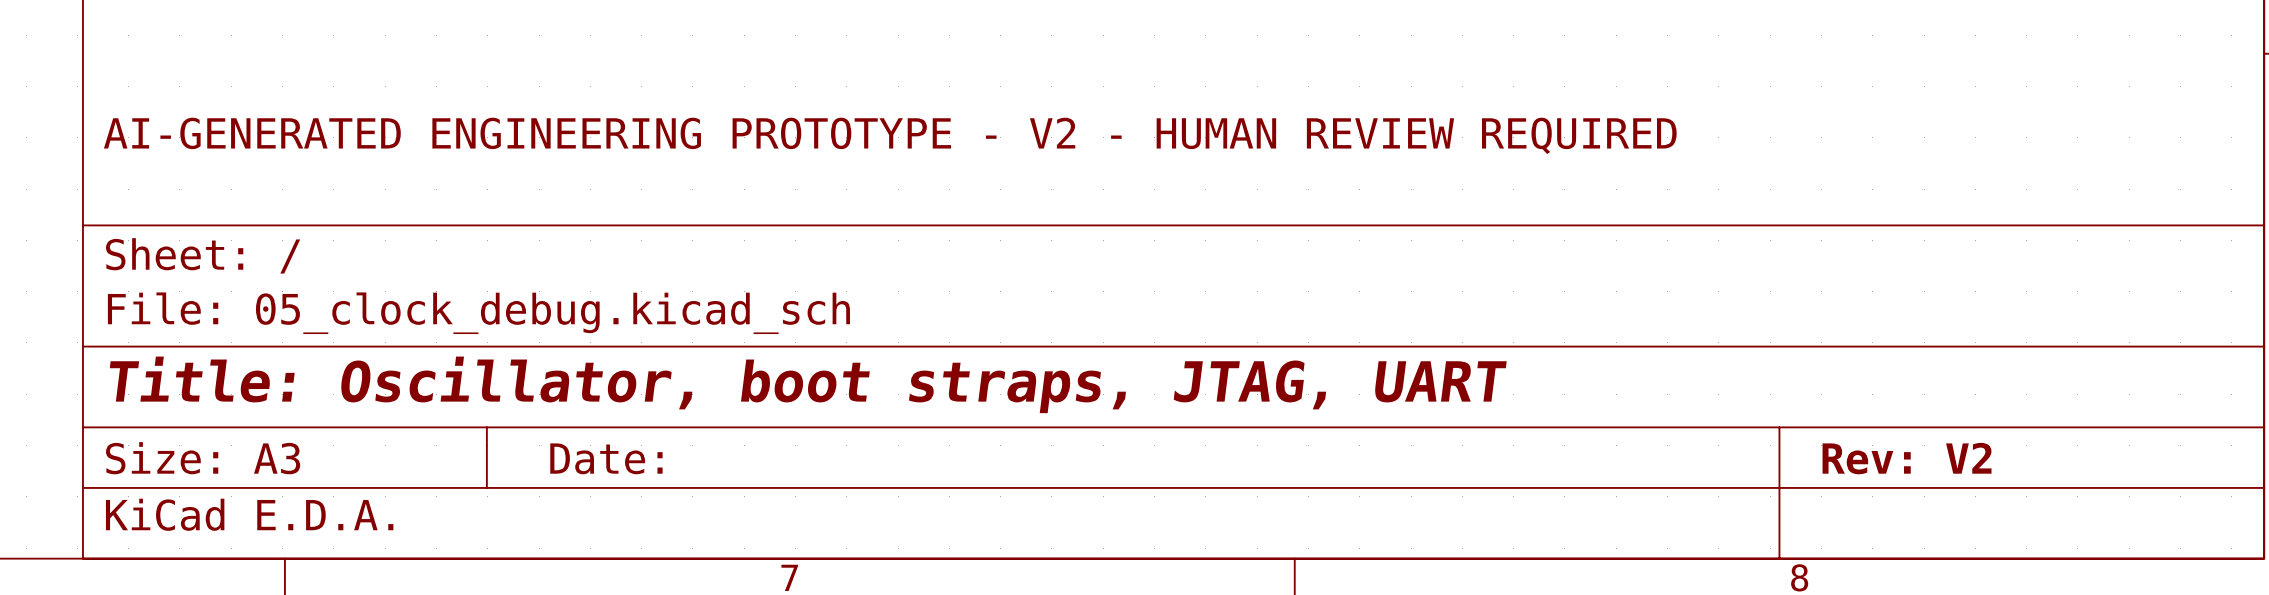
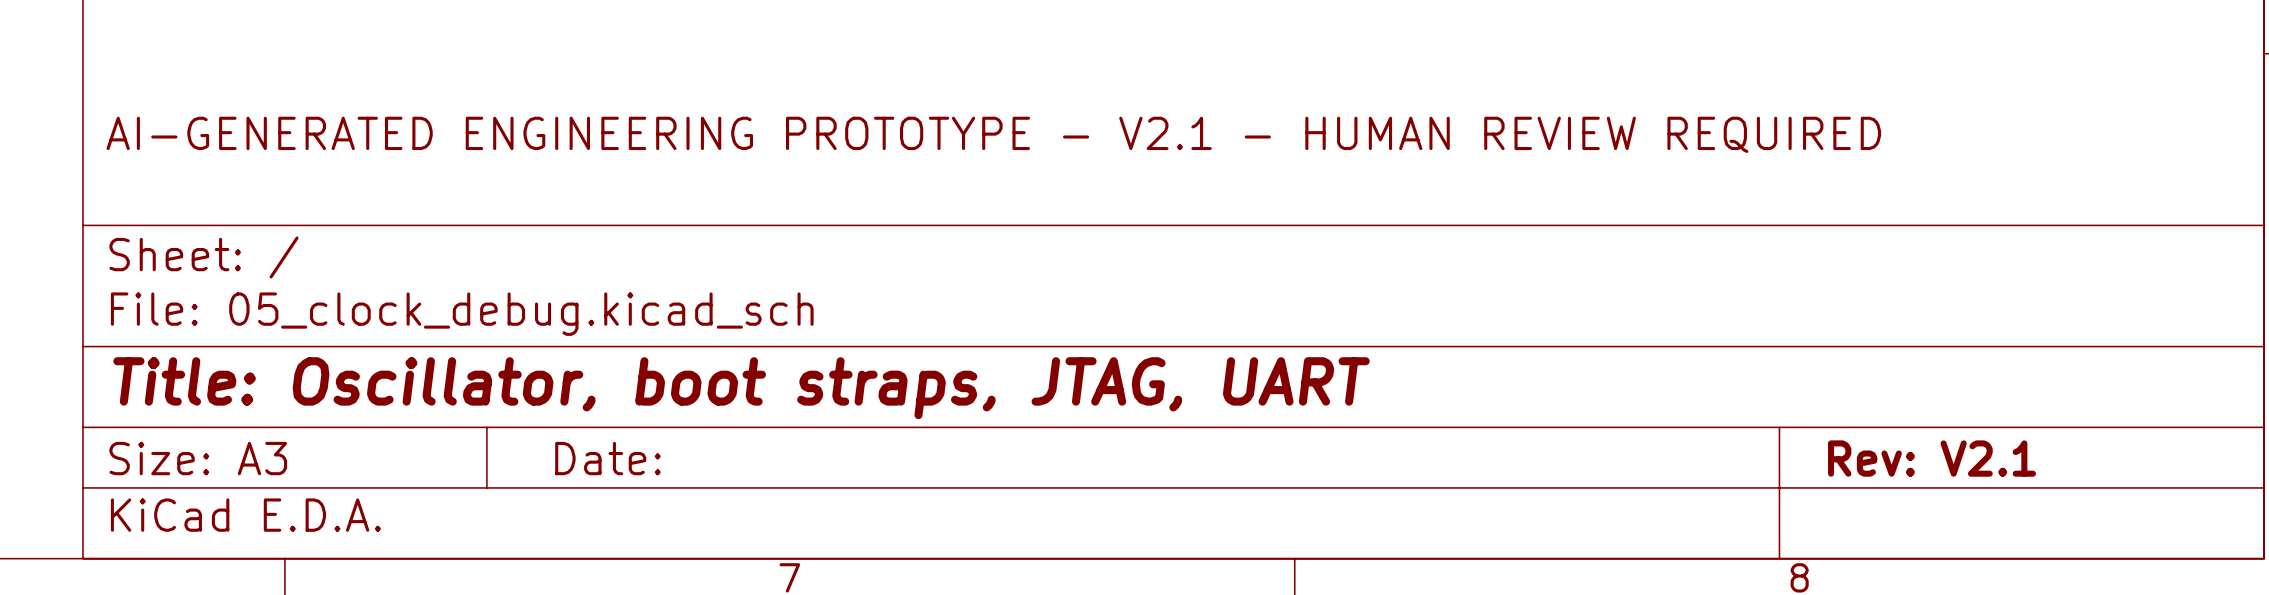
title block: AI-GENERATED ENGINEERING PROTOTYPE - V2 - HUMAN REVIEW REQUIRED (890, 135) -> AI-GENERATED ENGINEERING PROTOTYPE - V2.1 - HUMAN REVIEW REQUIRED (993, 134)
title block: Rev: V2 (1907, 458) -> Rev: V2.1 (1932, 458)

